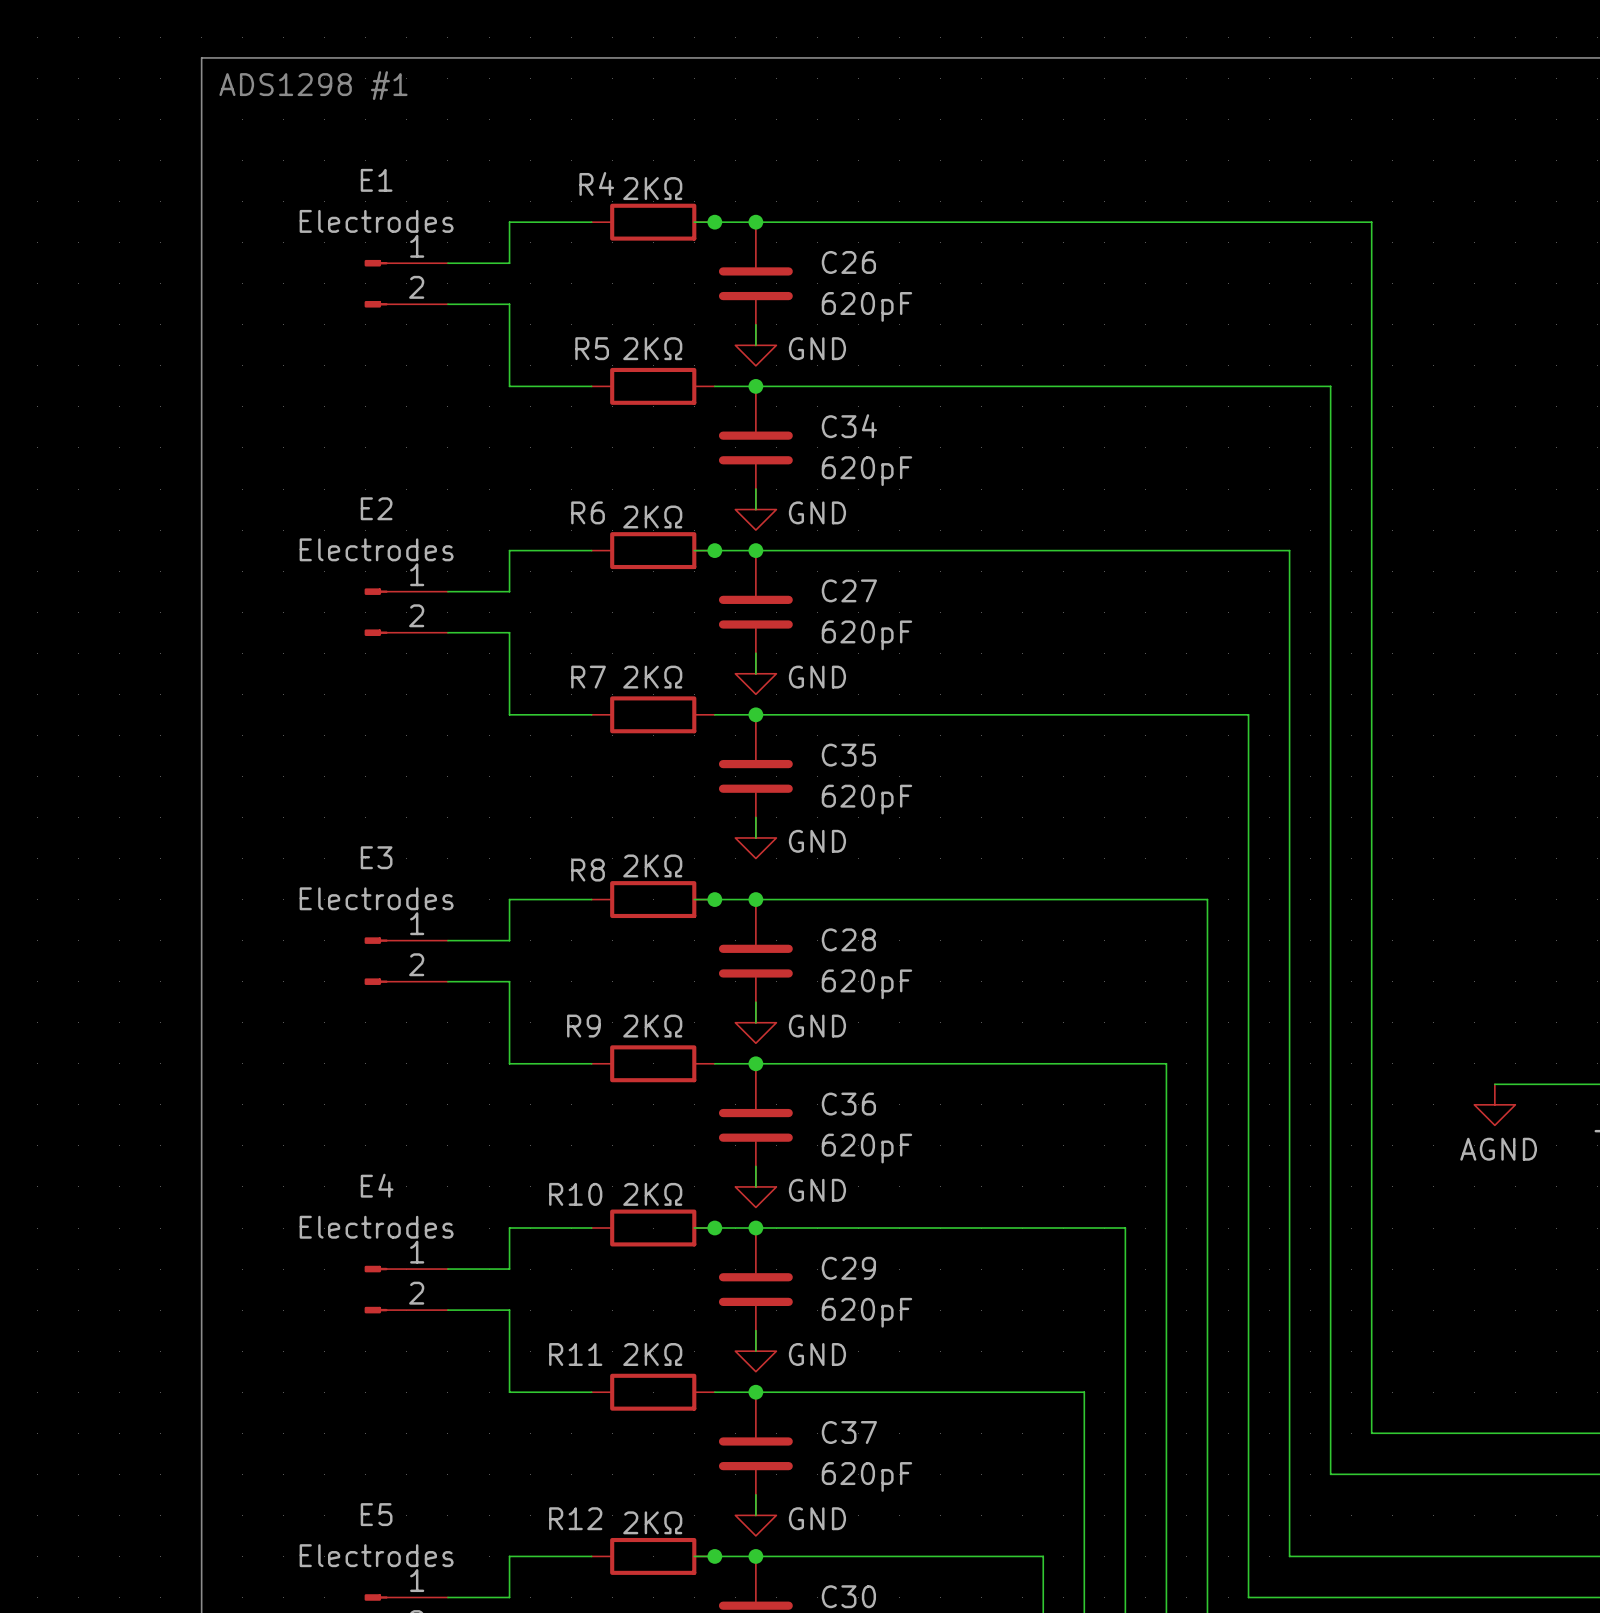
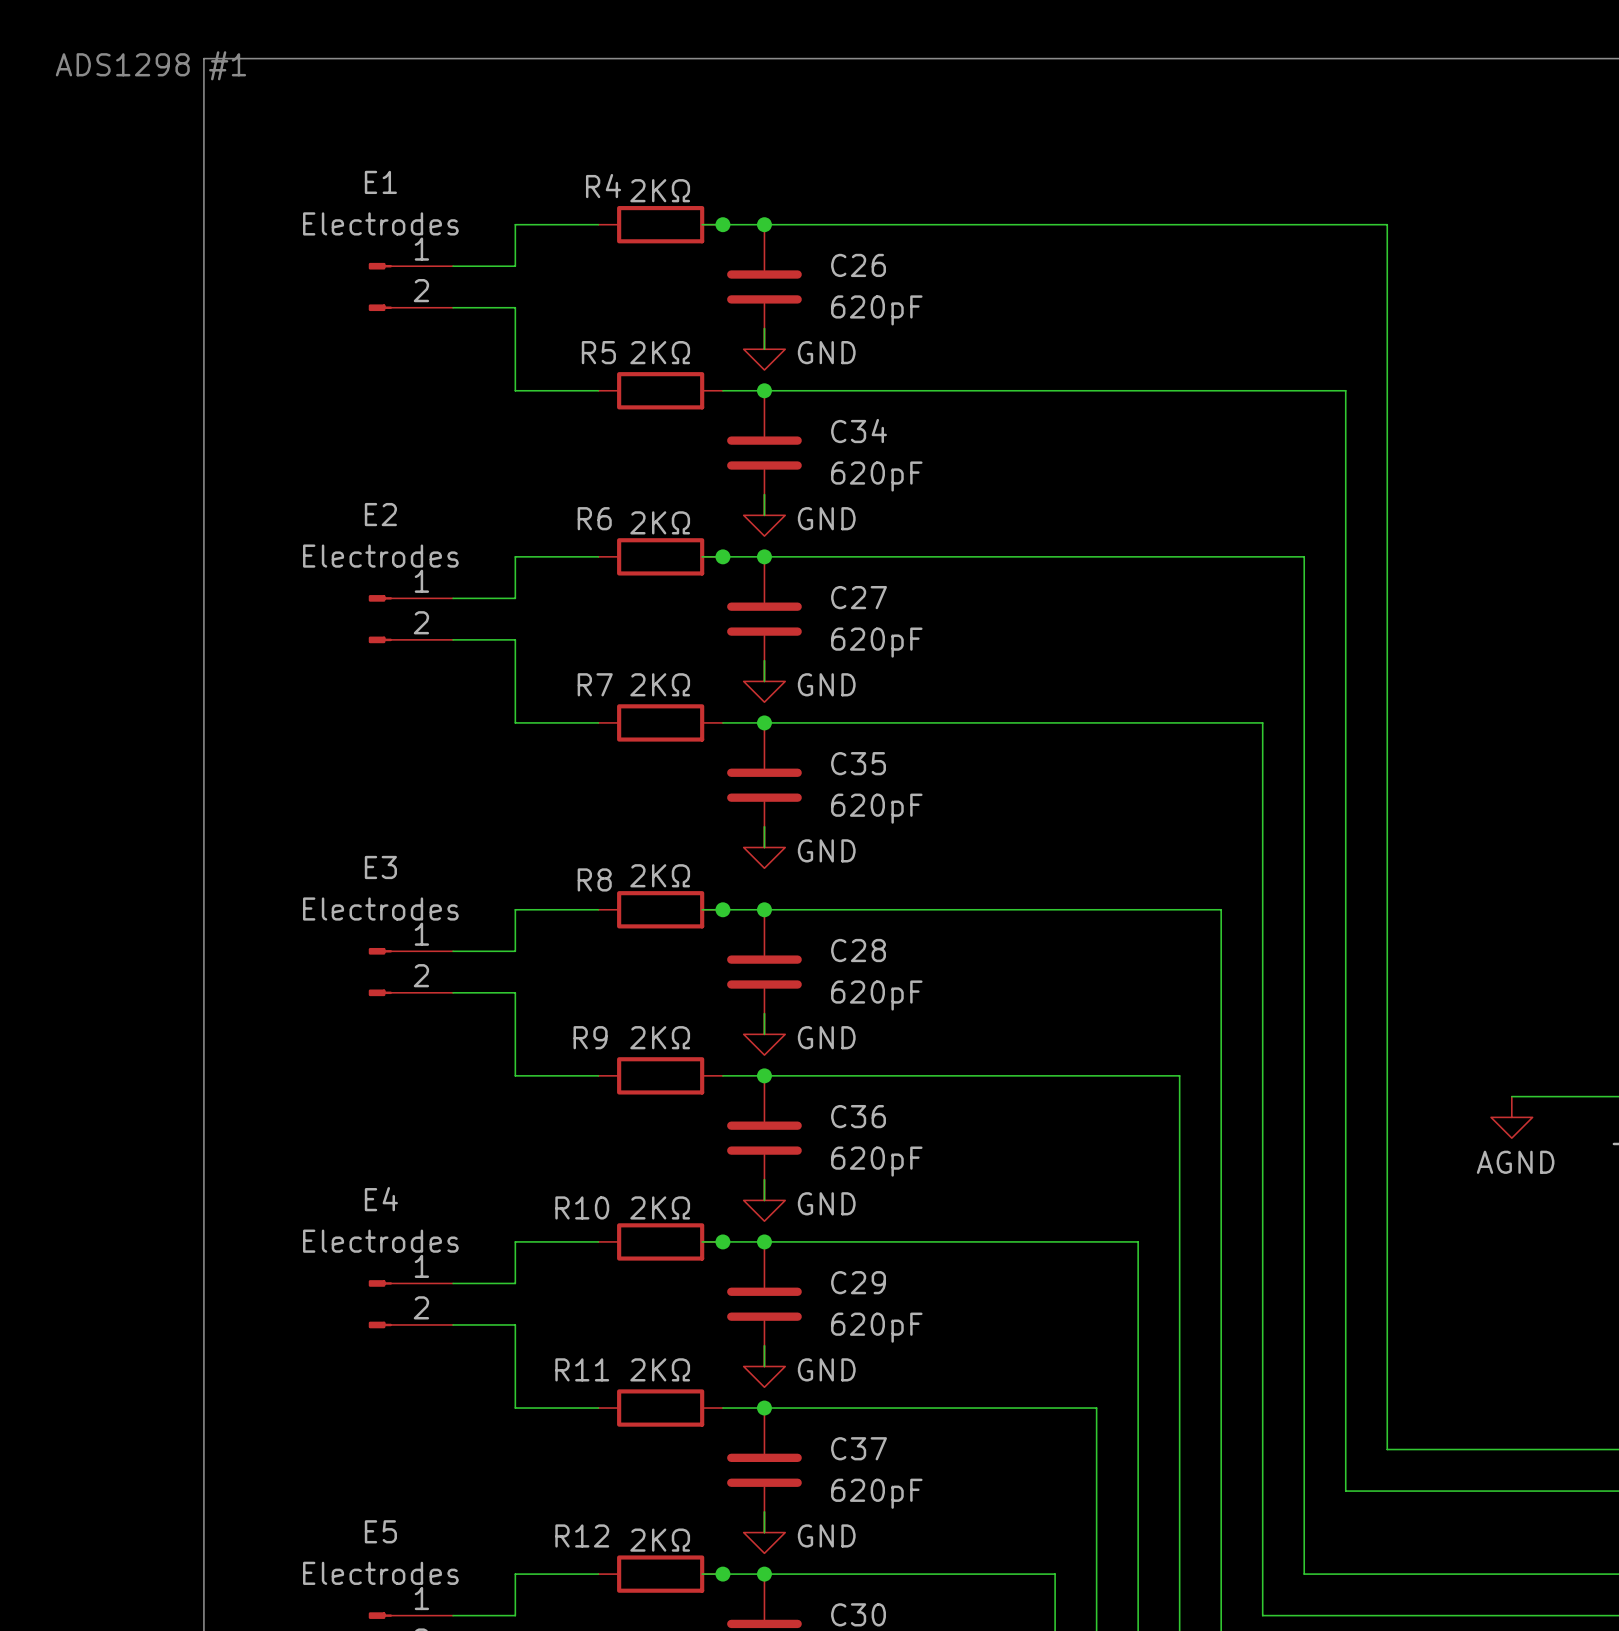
text position: ADS1298 #1 (313, 85) -> ADS1298 #1 (150, 65)

